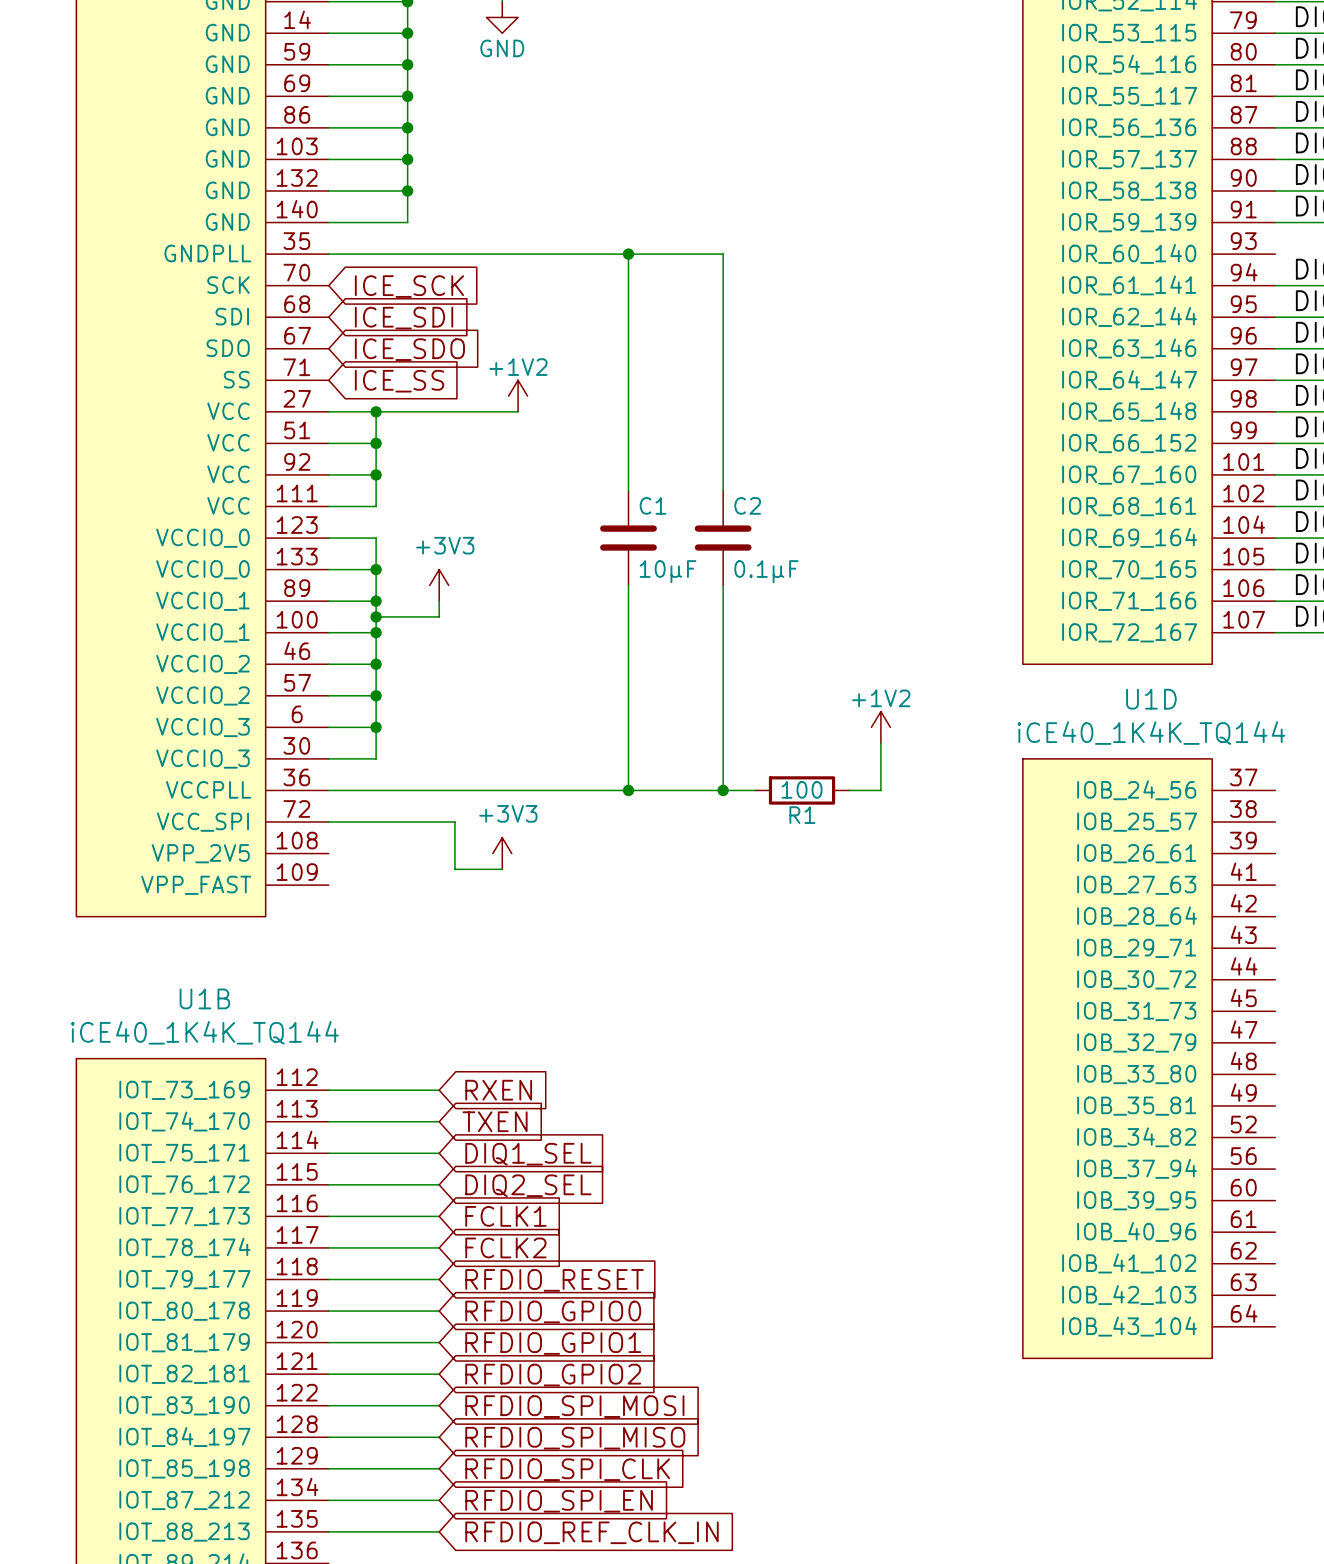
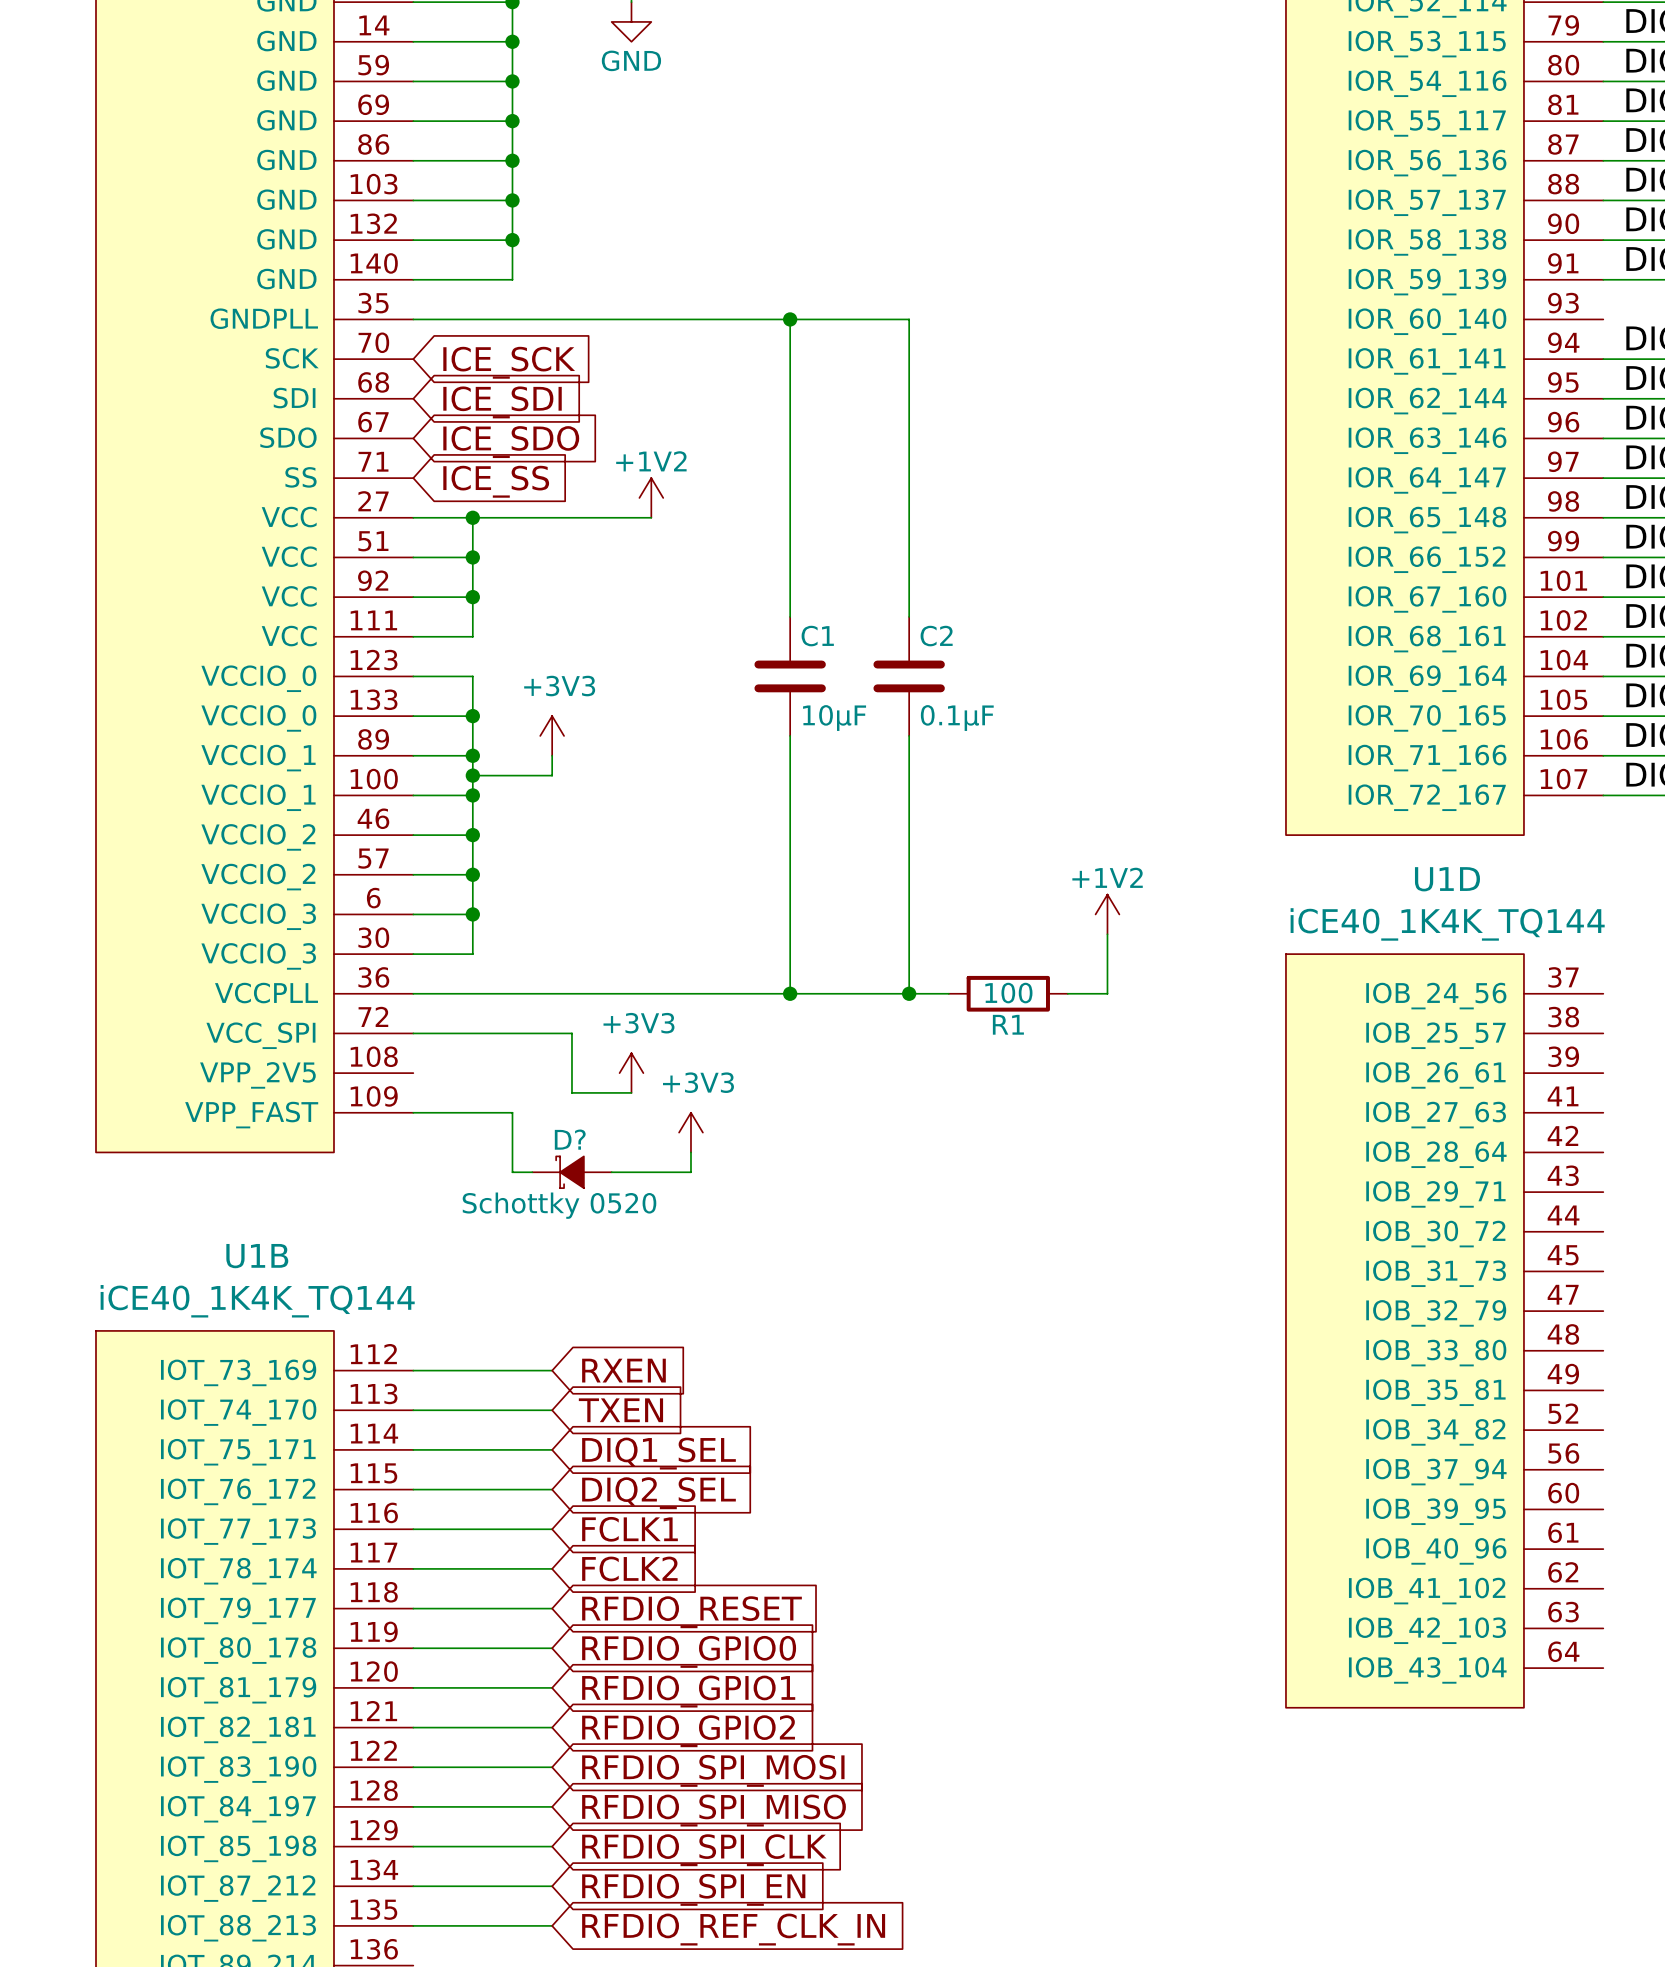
wire: none -> (413, 1112) (512, 1112) (512, 1172) (532, 1172)
power symbol: none -> +3V3 (690, 1132)
wire: none -> (690, 1152) (690, 1172) (611, 1172)
D?: none -> Schottky 0520 (571, 1172)

